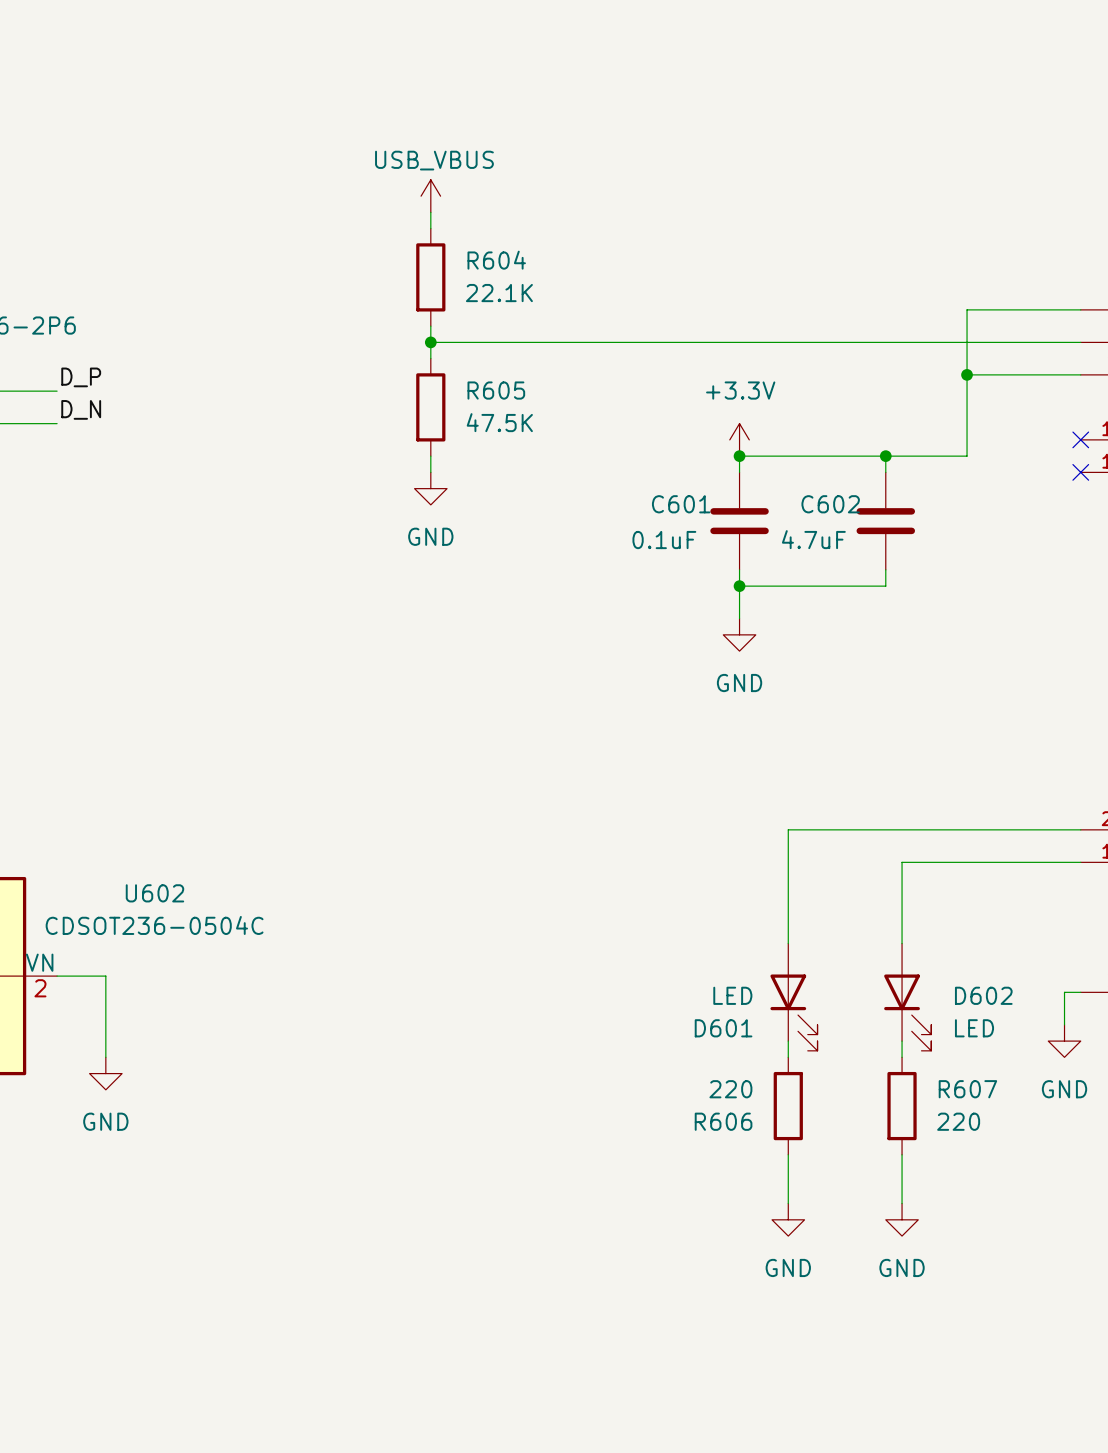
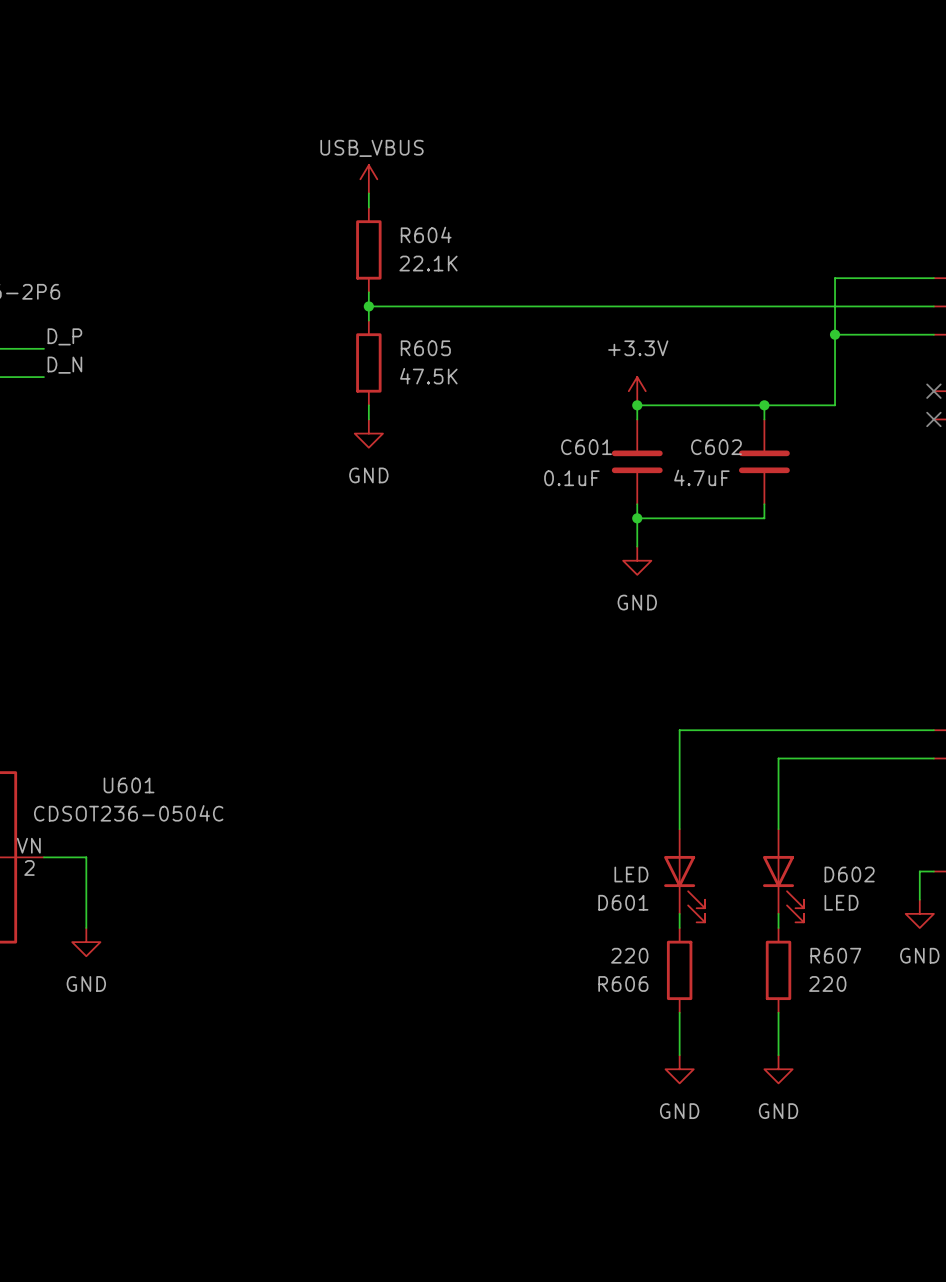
U602 name: U602 (154, 893) -> U601 (129, 785)

